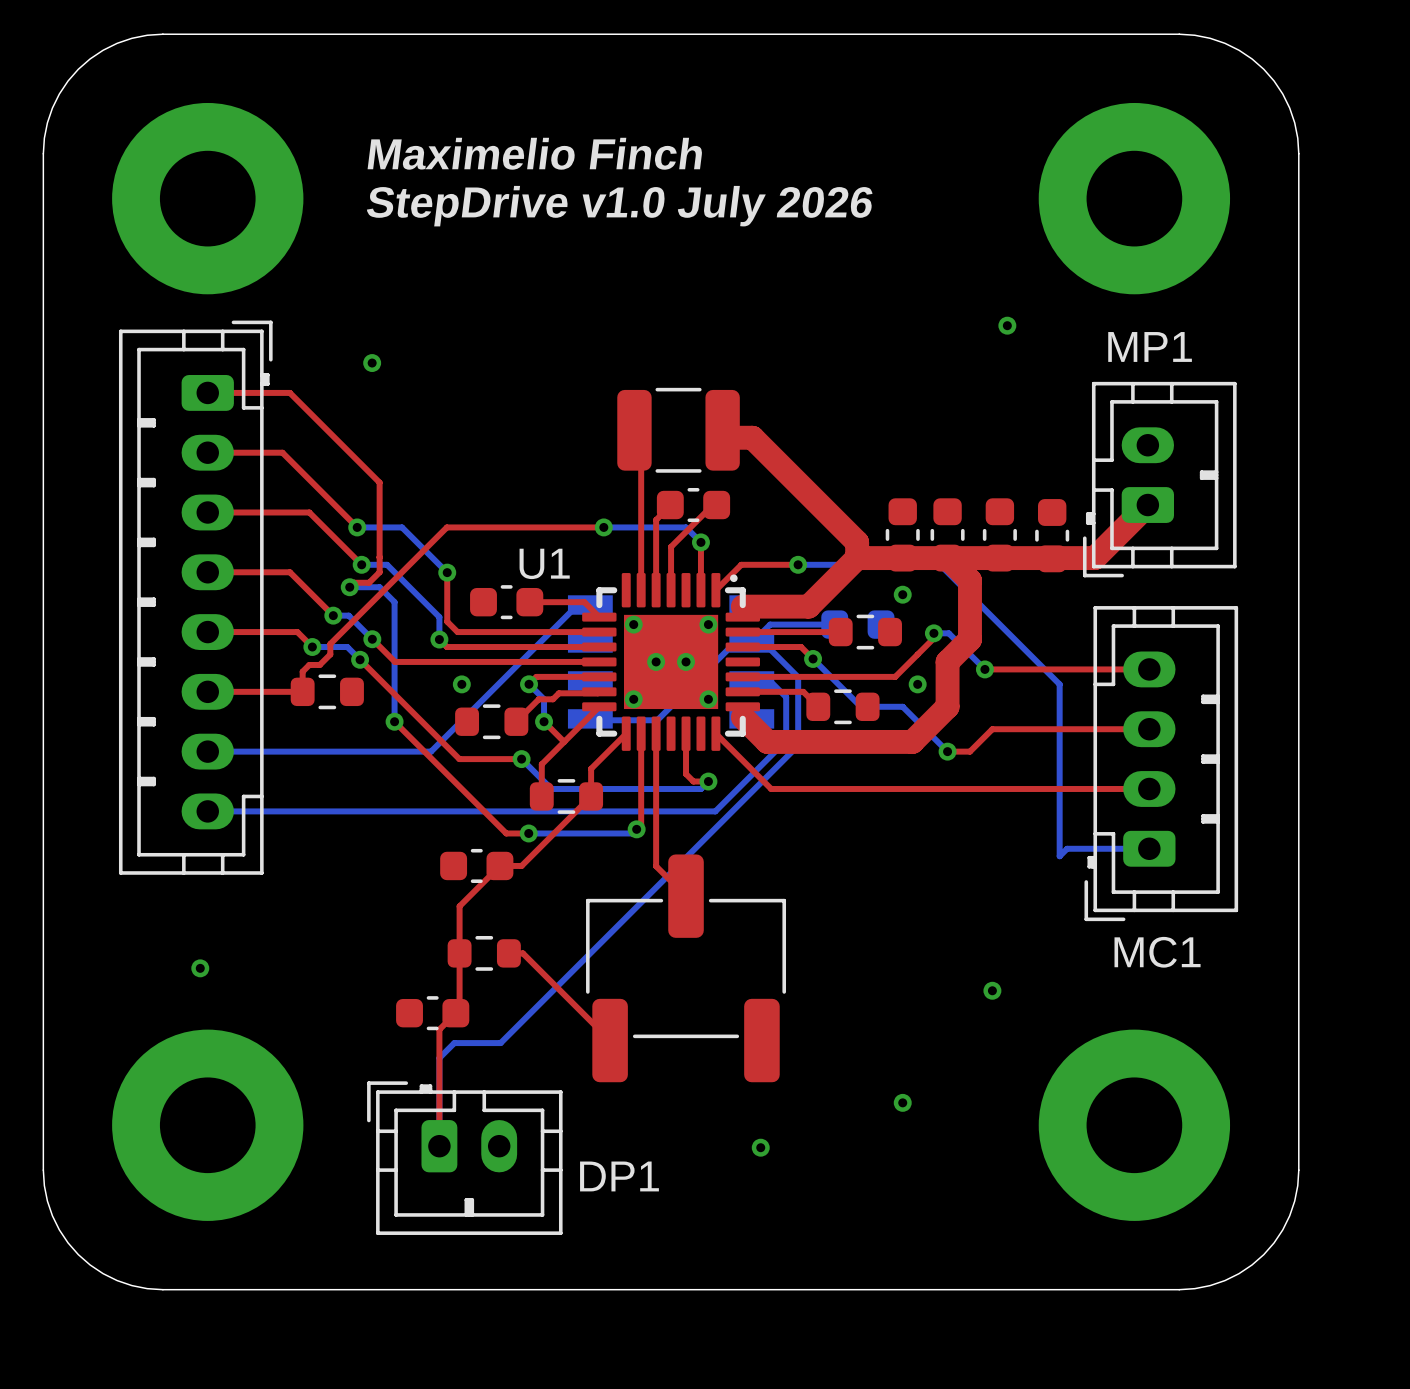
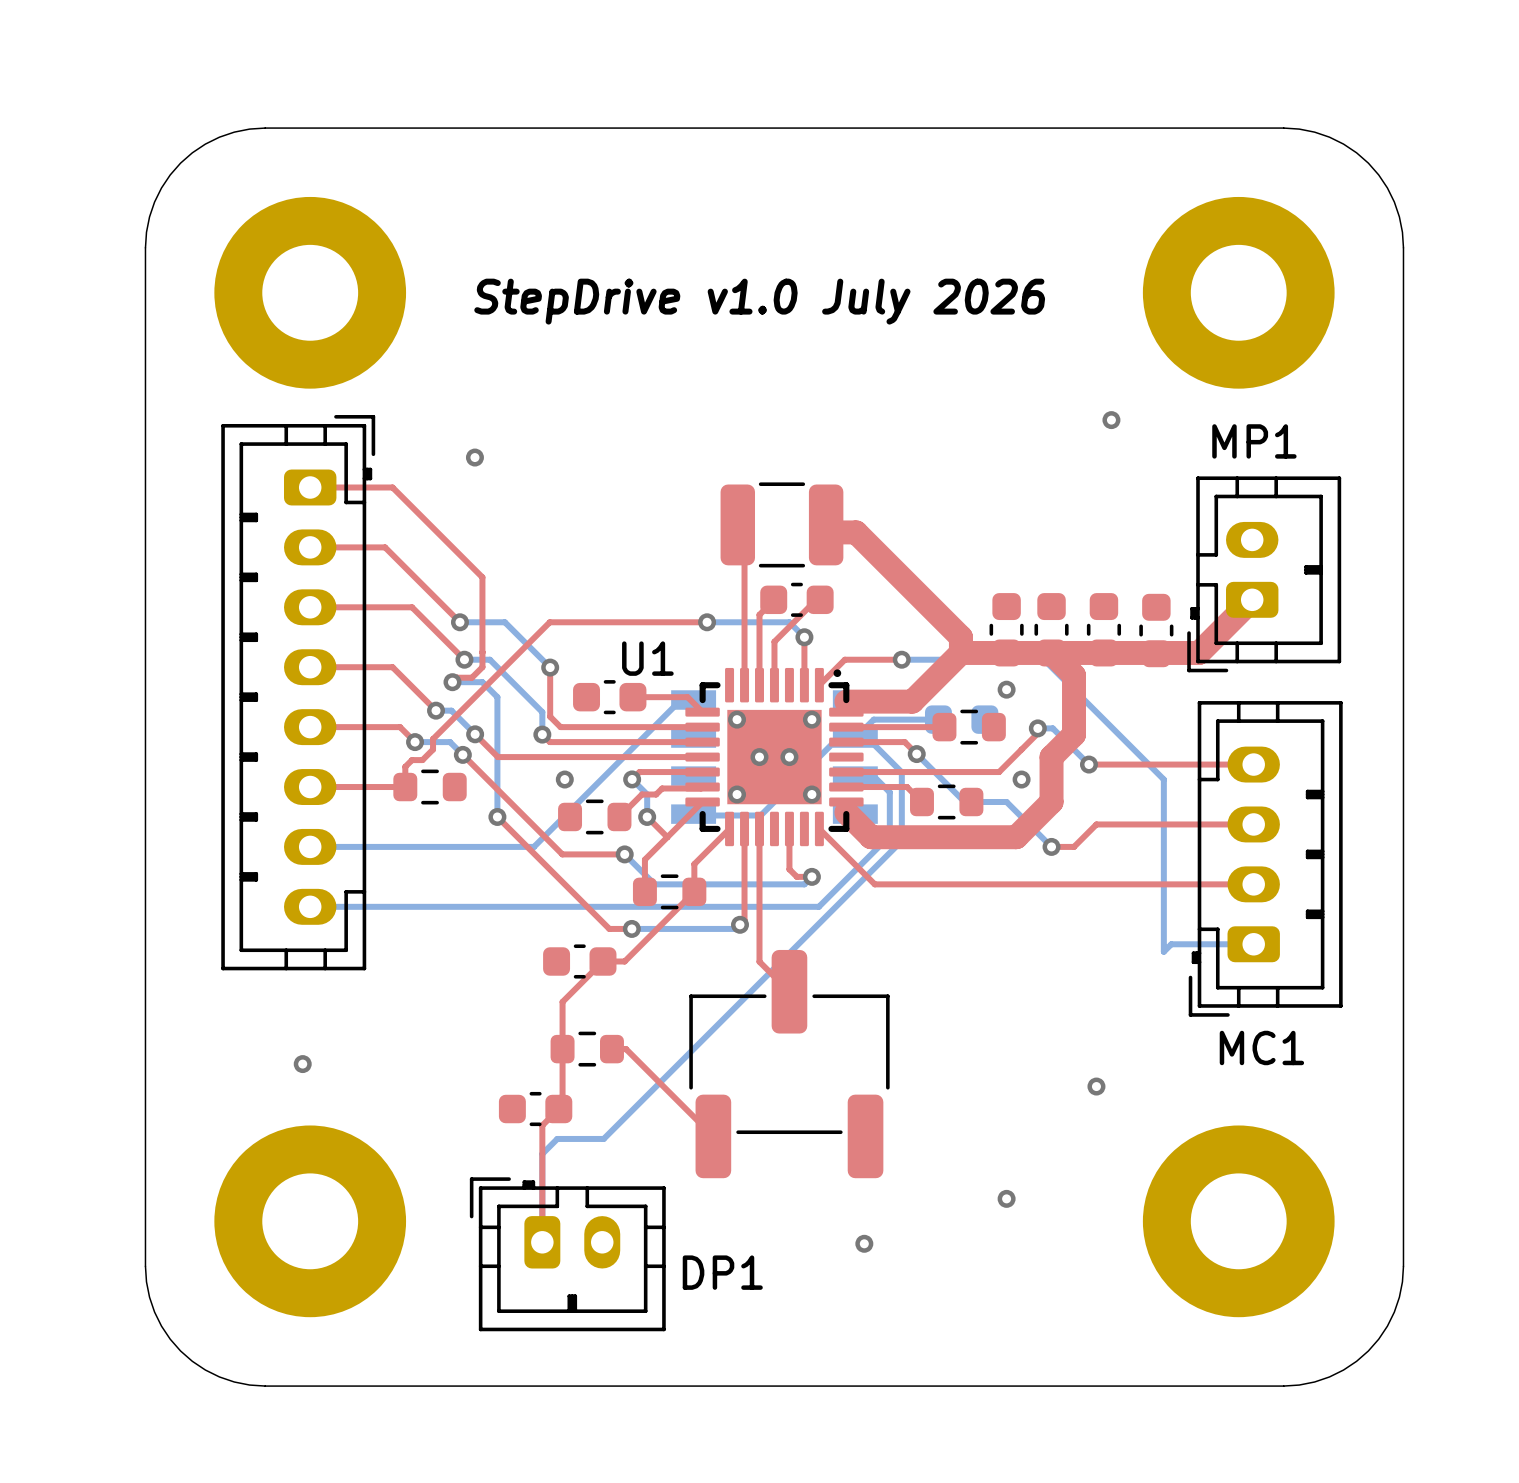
text: Maximelio Finch (534, 153) -> none

